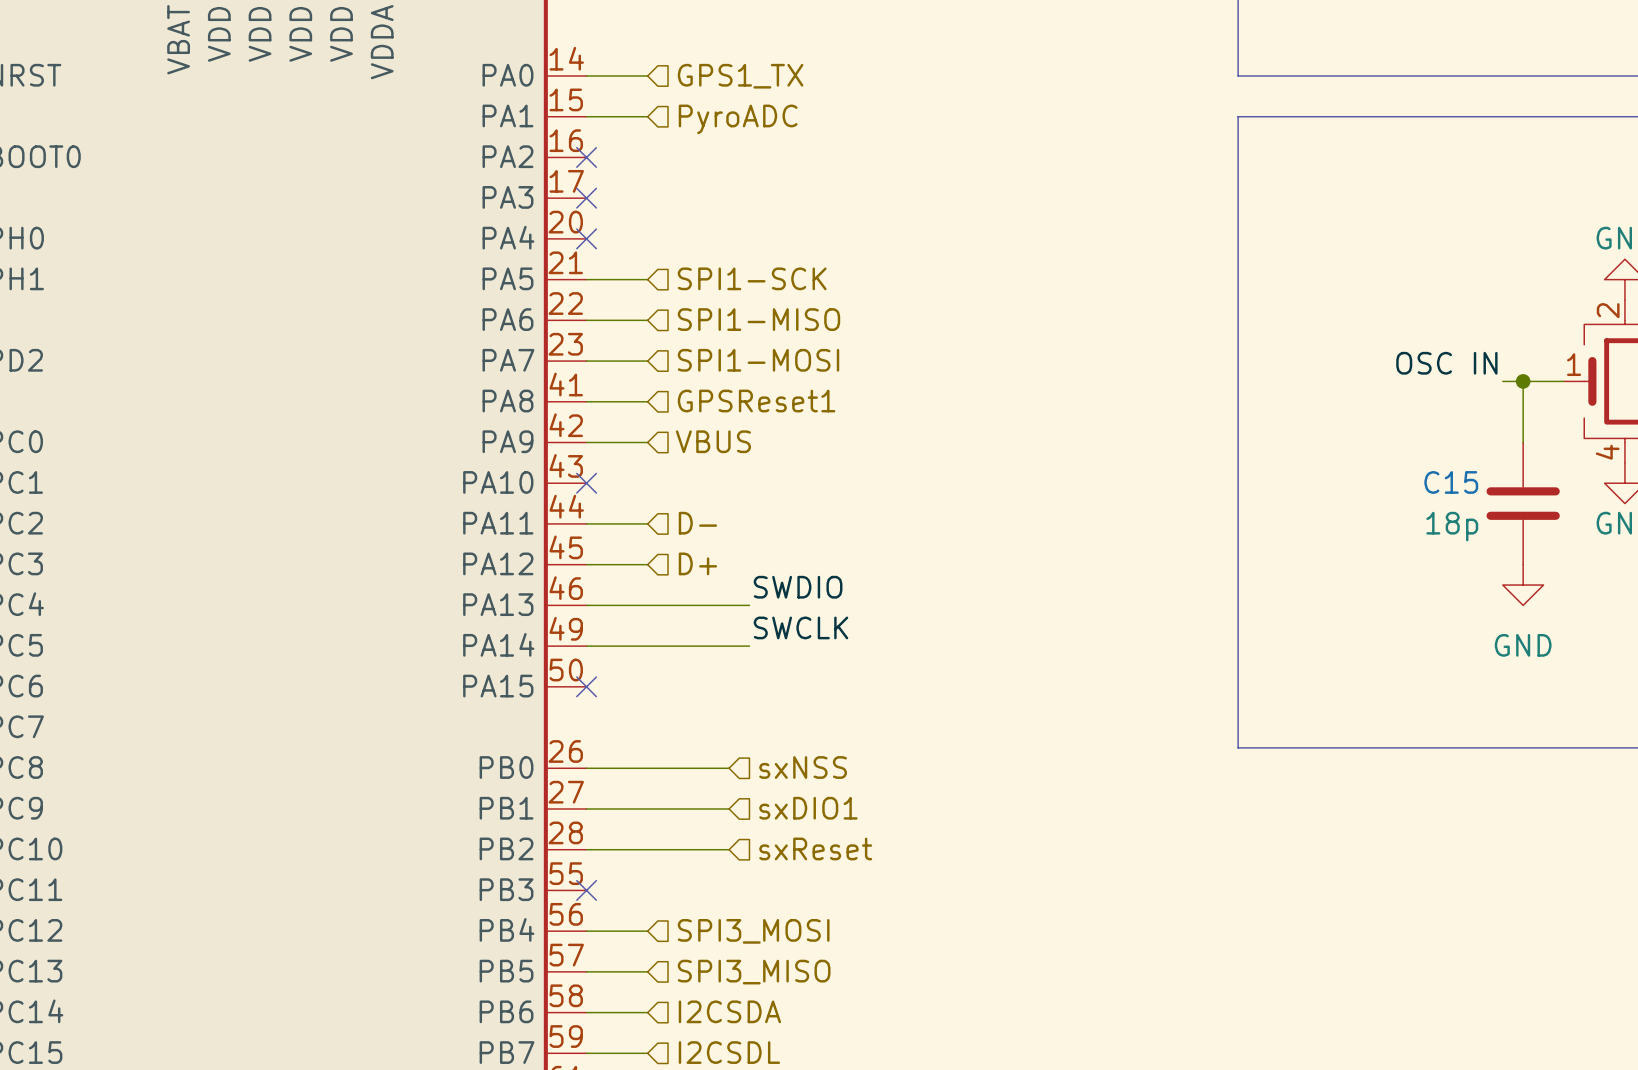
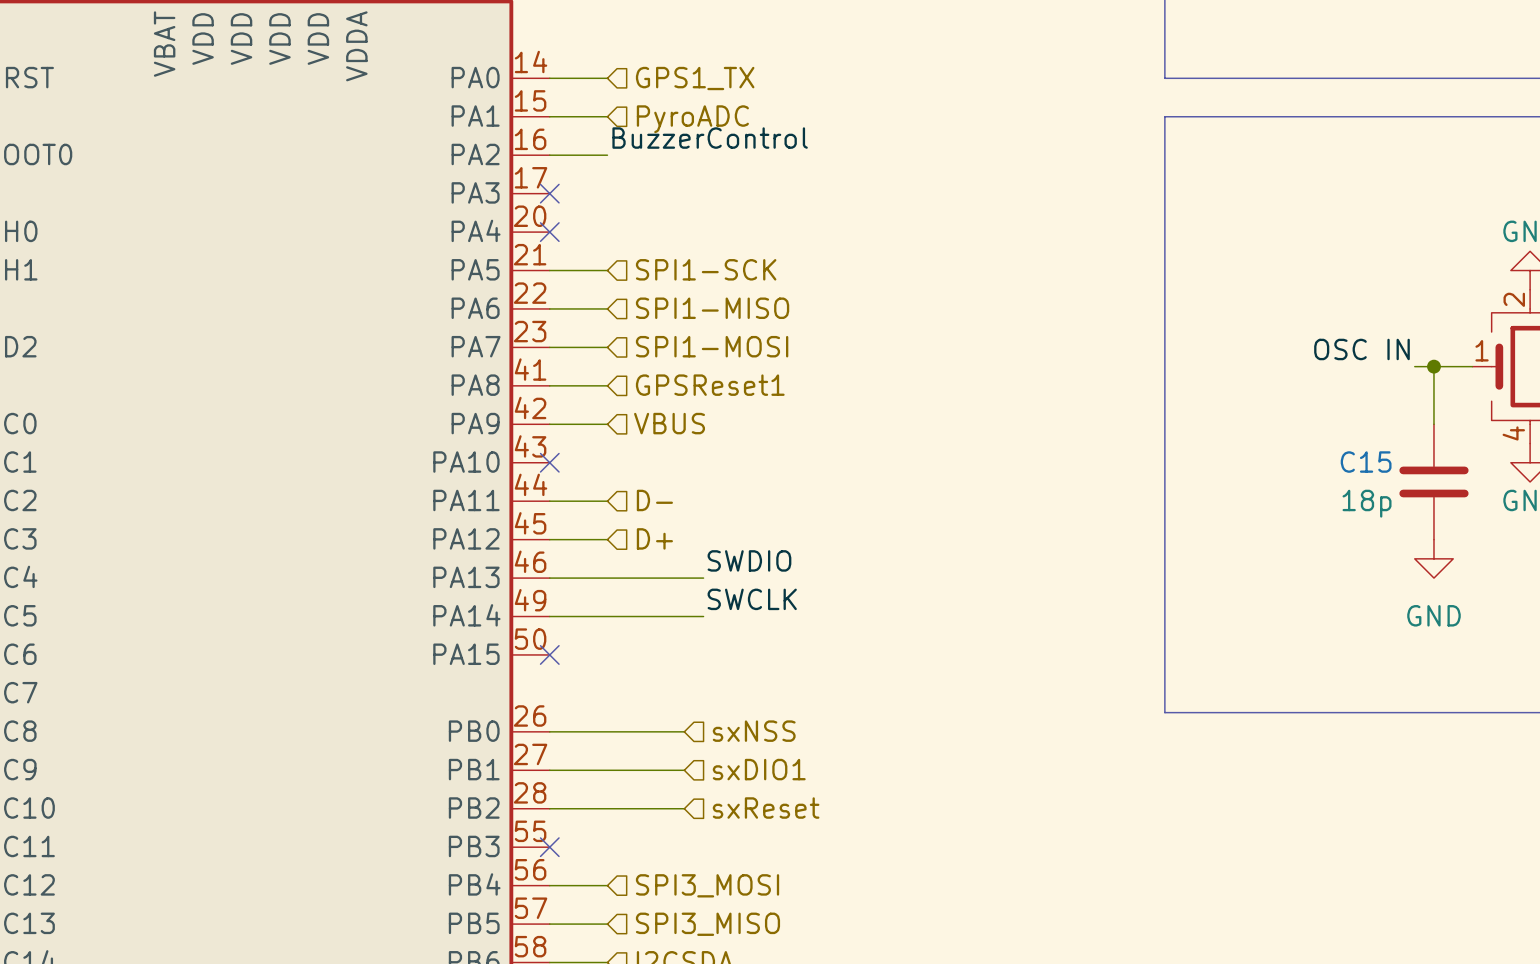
label: none -> BuzzerControl (710, 138)
wire: none -> (549, 155) (607, 155)
no-connect mark: (586, 157) -> none

